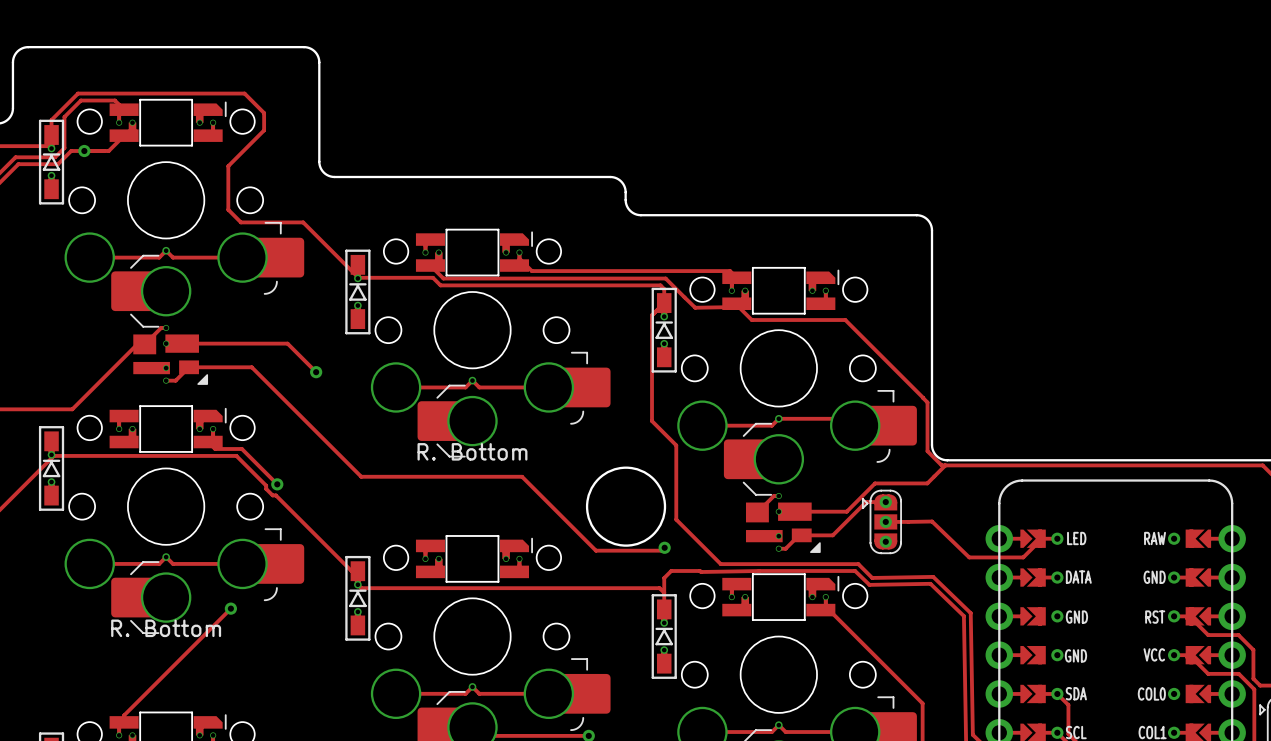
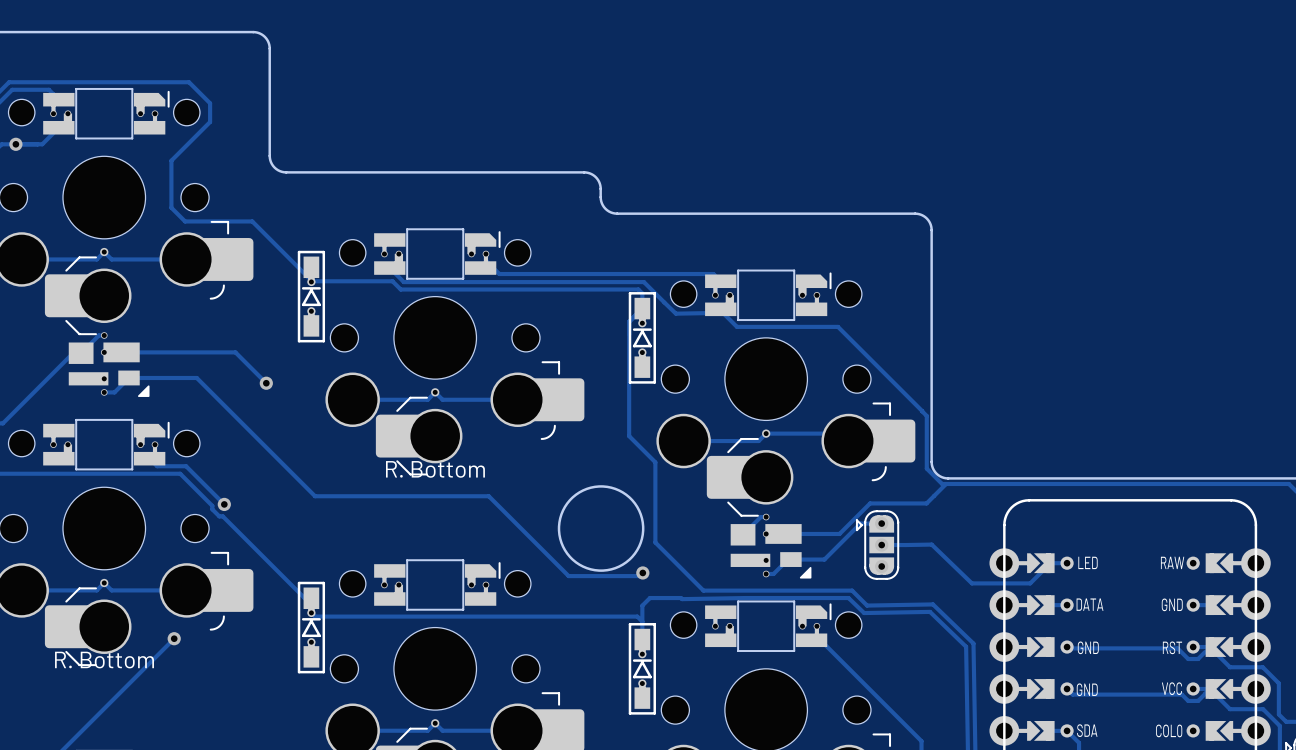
track: none -> (1068, 648) (1177, 648) (1188, 659) (1198, 659) (1205, 652)
track: none -> (1067, 688) (1072, 694) (1181, 694) (1188, 700) (1198, 700) (1205, 693)

